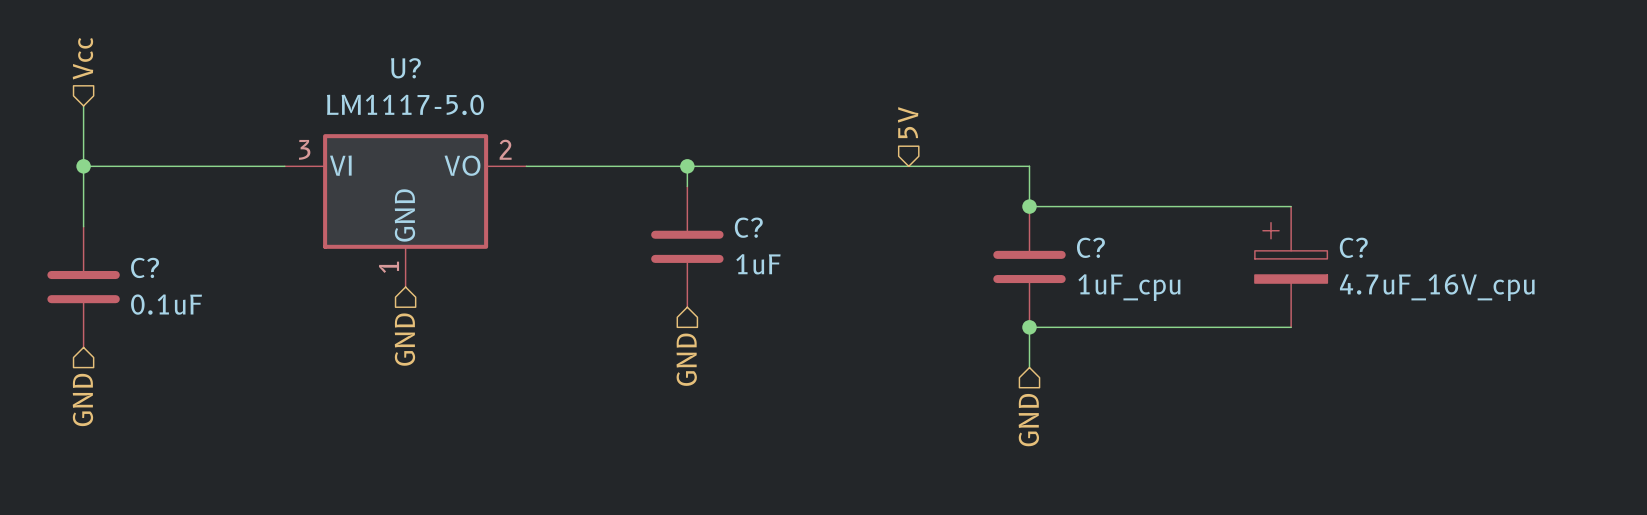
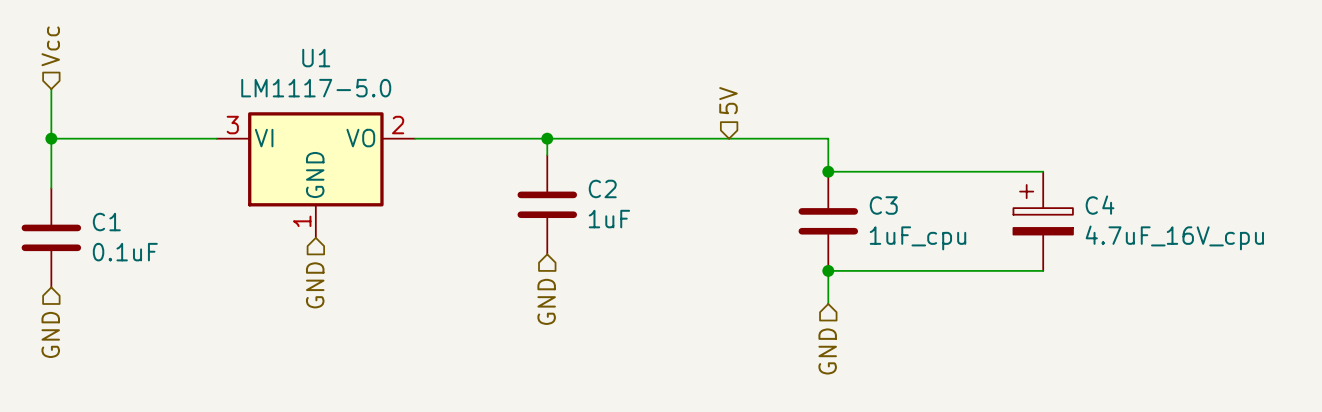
U? name: U? (405, 68) -> U1 (316, 58)
C? name: C? (748, 227) -> C2 (602, 188)
C? name: C? (1090, 247) -> C3 (883, 205)
C? name: C? (1353, 247) -> C4 (1100, 205)
C? name: C? (145, 267) -> C1 (106, 222)

